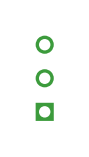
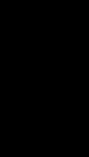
part: (44, 78) -> none

